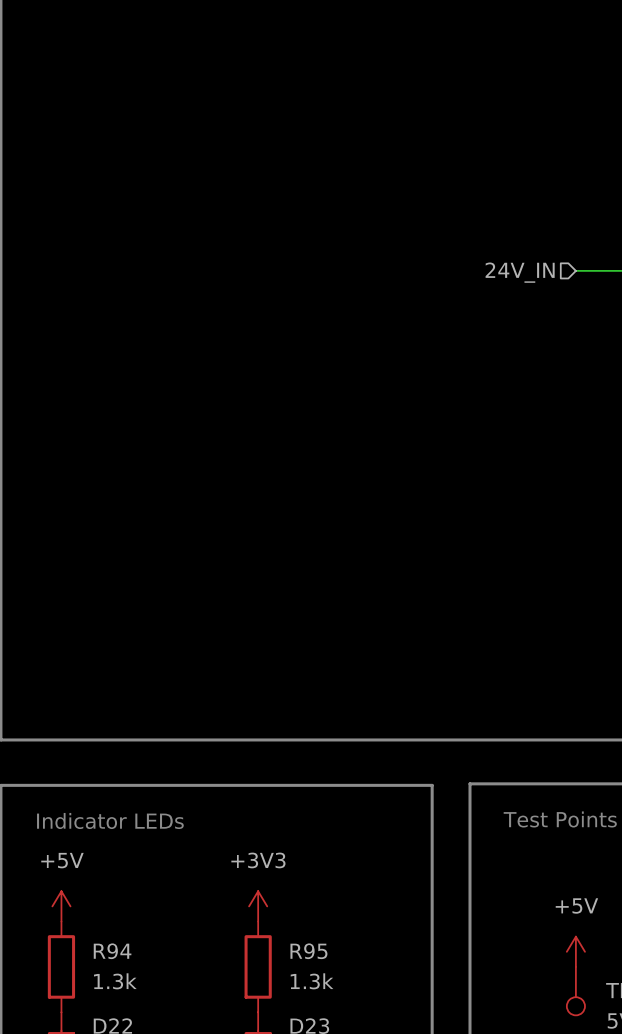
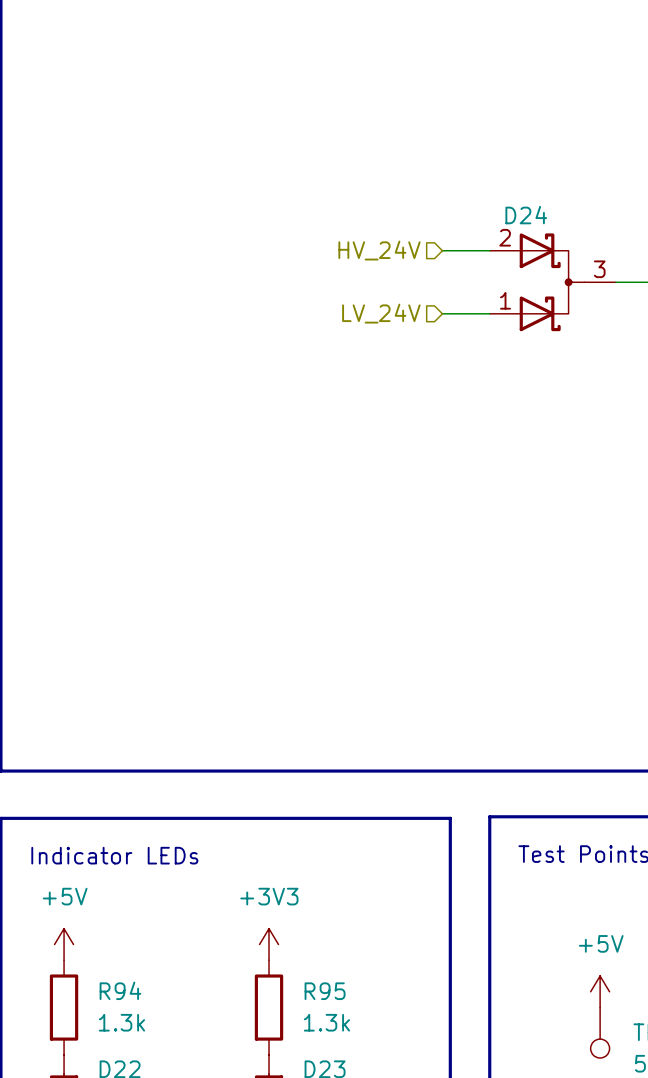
wire: none -> (442, 250) (489, 250)
hierarchical label: none -> HV_24V (379, 250)
D24: none -> (552, 282)
hierarchical label: 24V_IN (520, 272) -> none
wire: none -> (442, 313) (489, 313)
hierarchical label: none -> LV_24V (381, 313)

